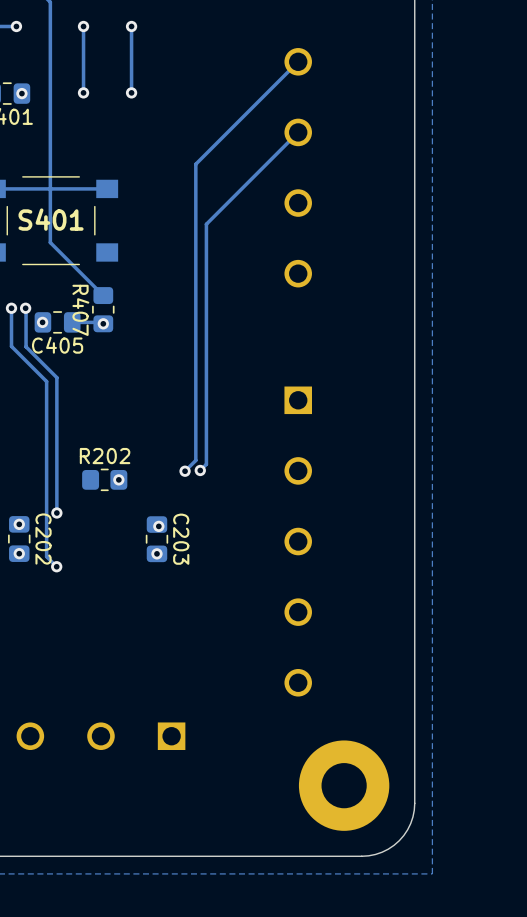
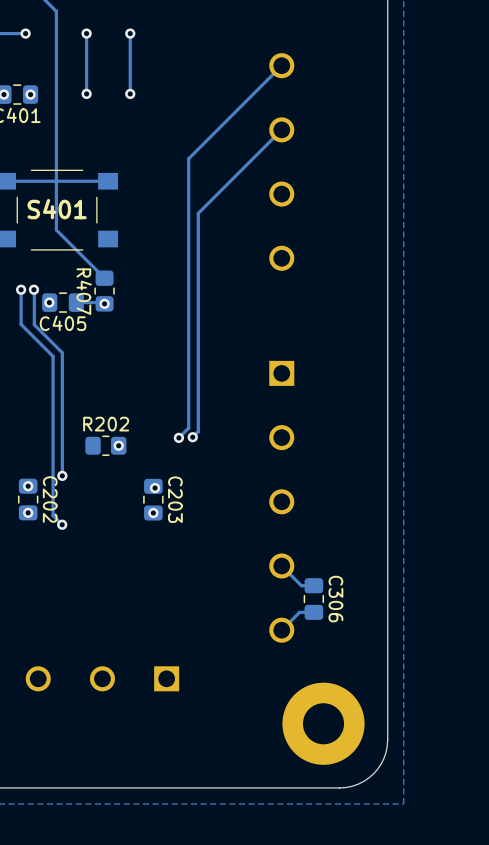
track: none -> (281, 566) (301, 585) (313, 585)
C306: none -> (313, 599)
track: none -> (313, 612) (299, 612) (281, 630)

